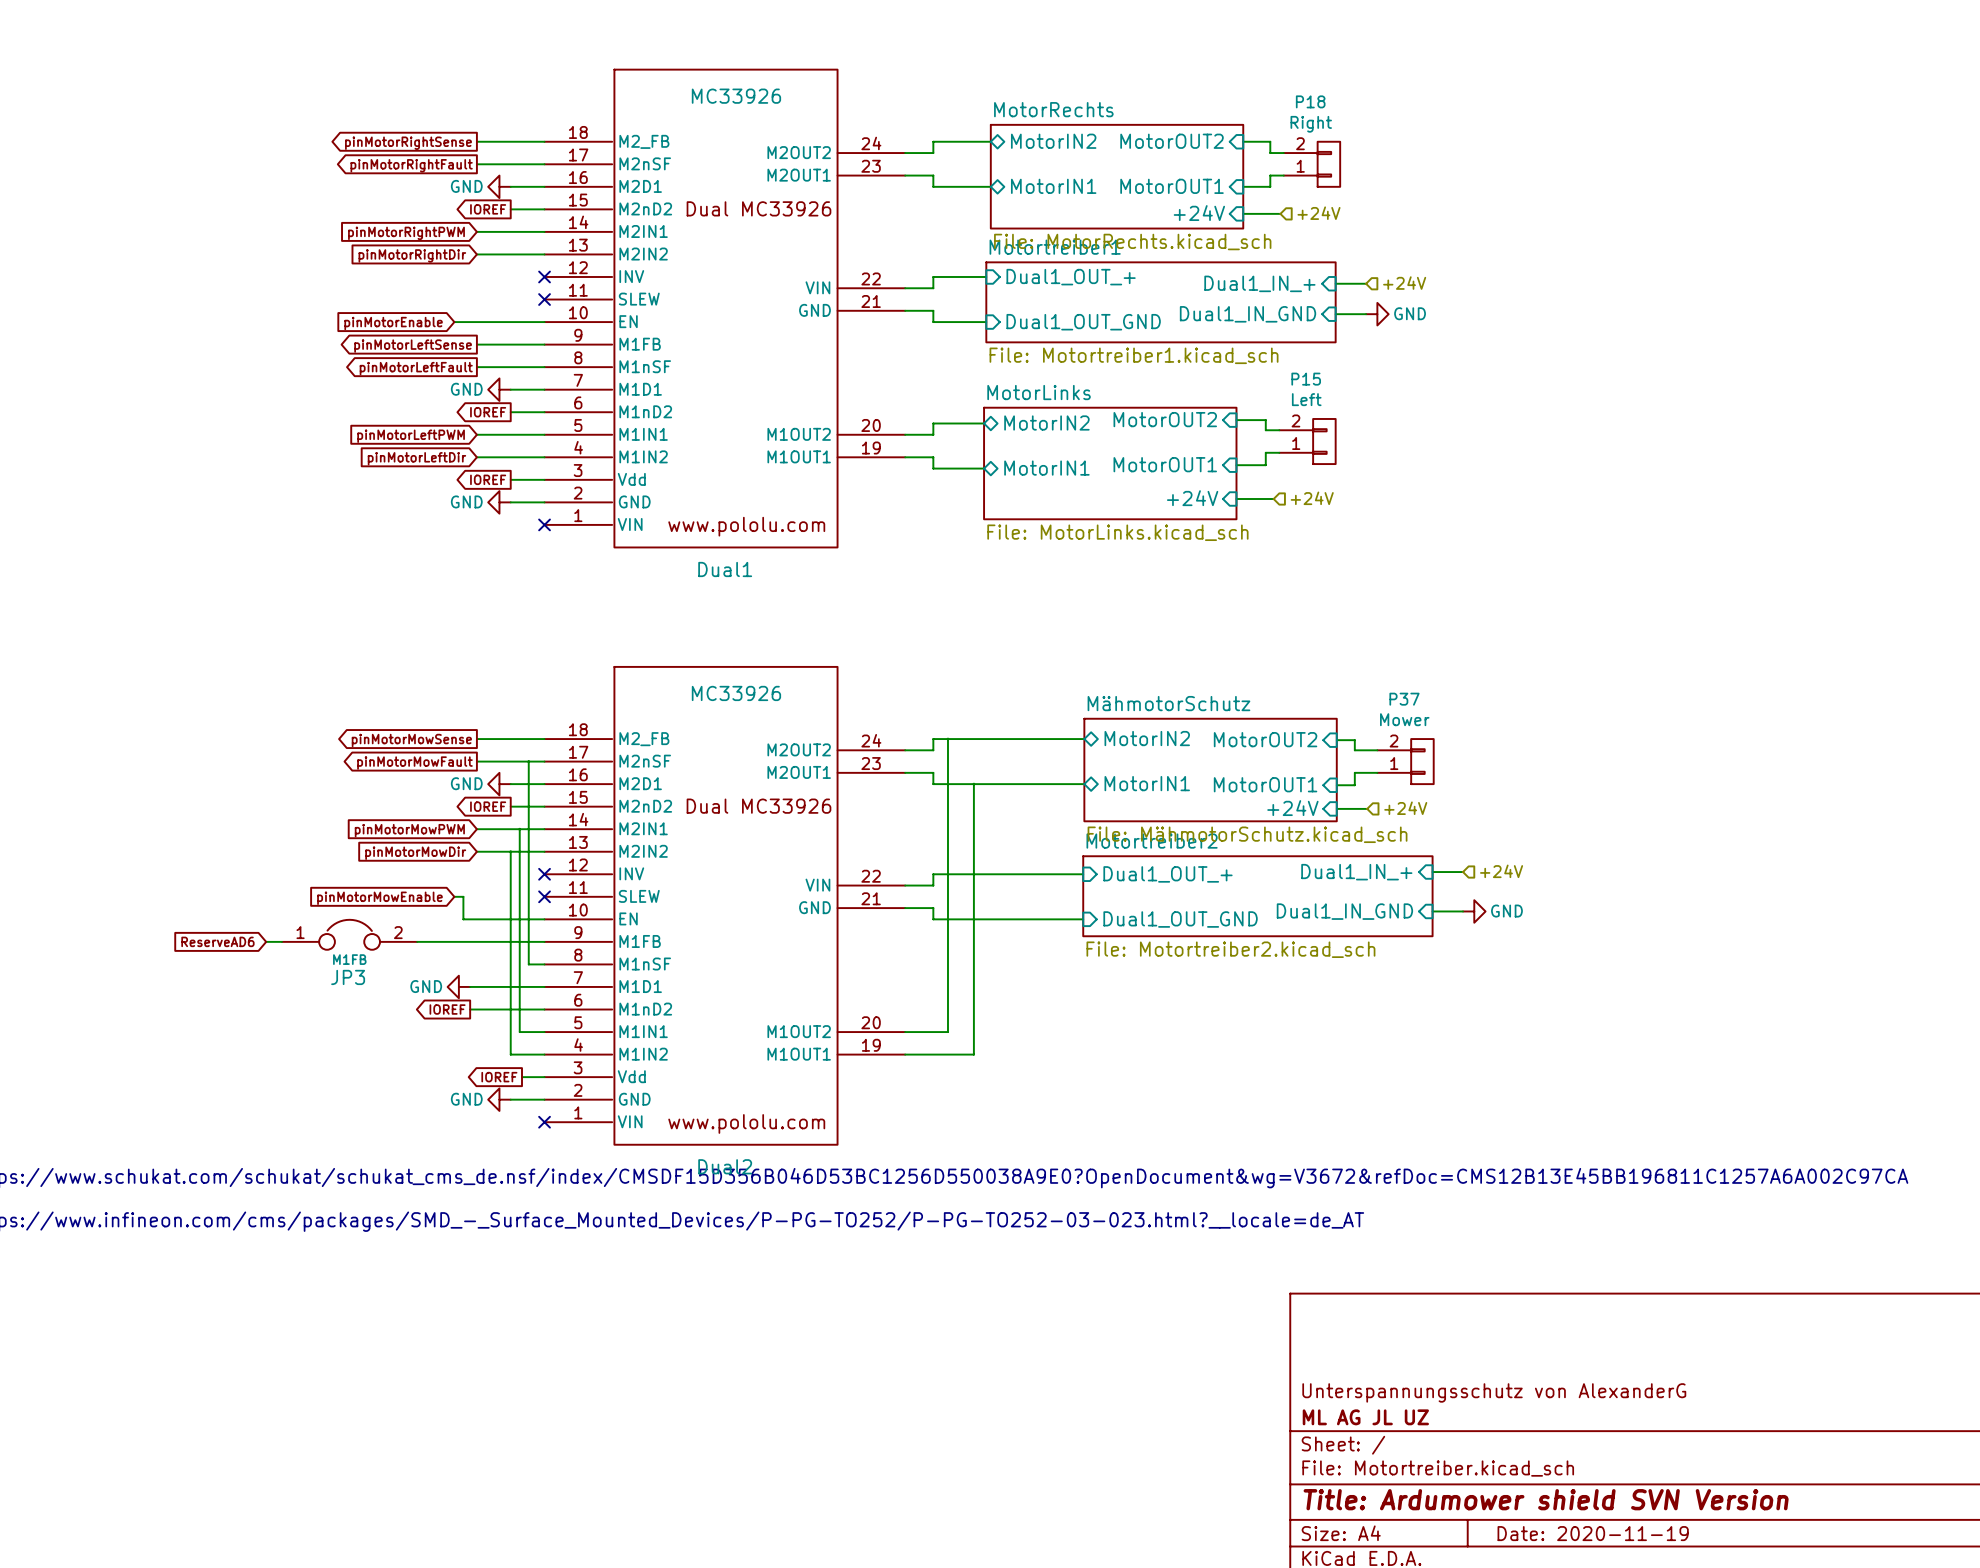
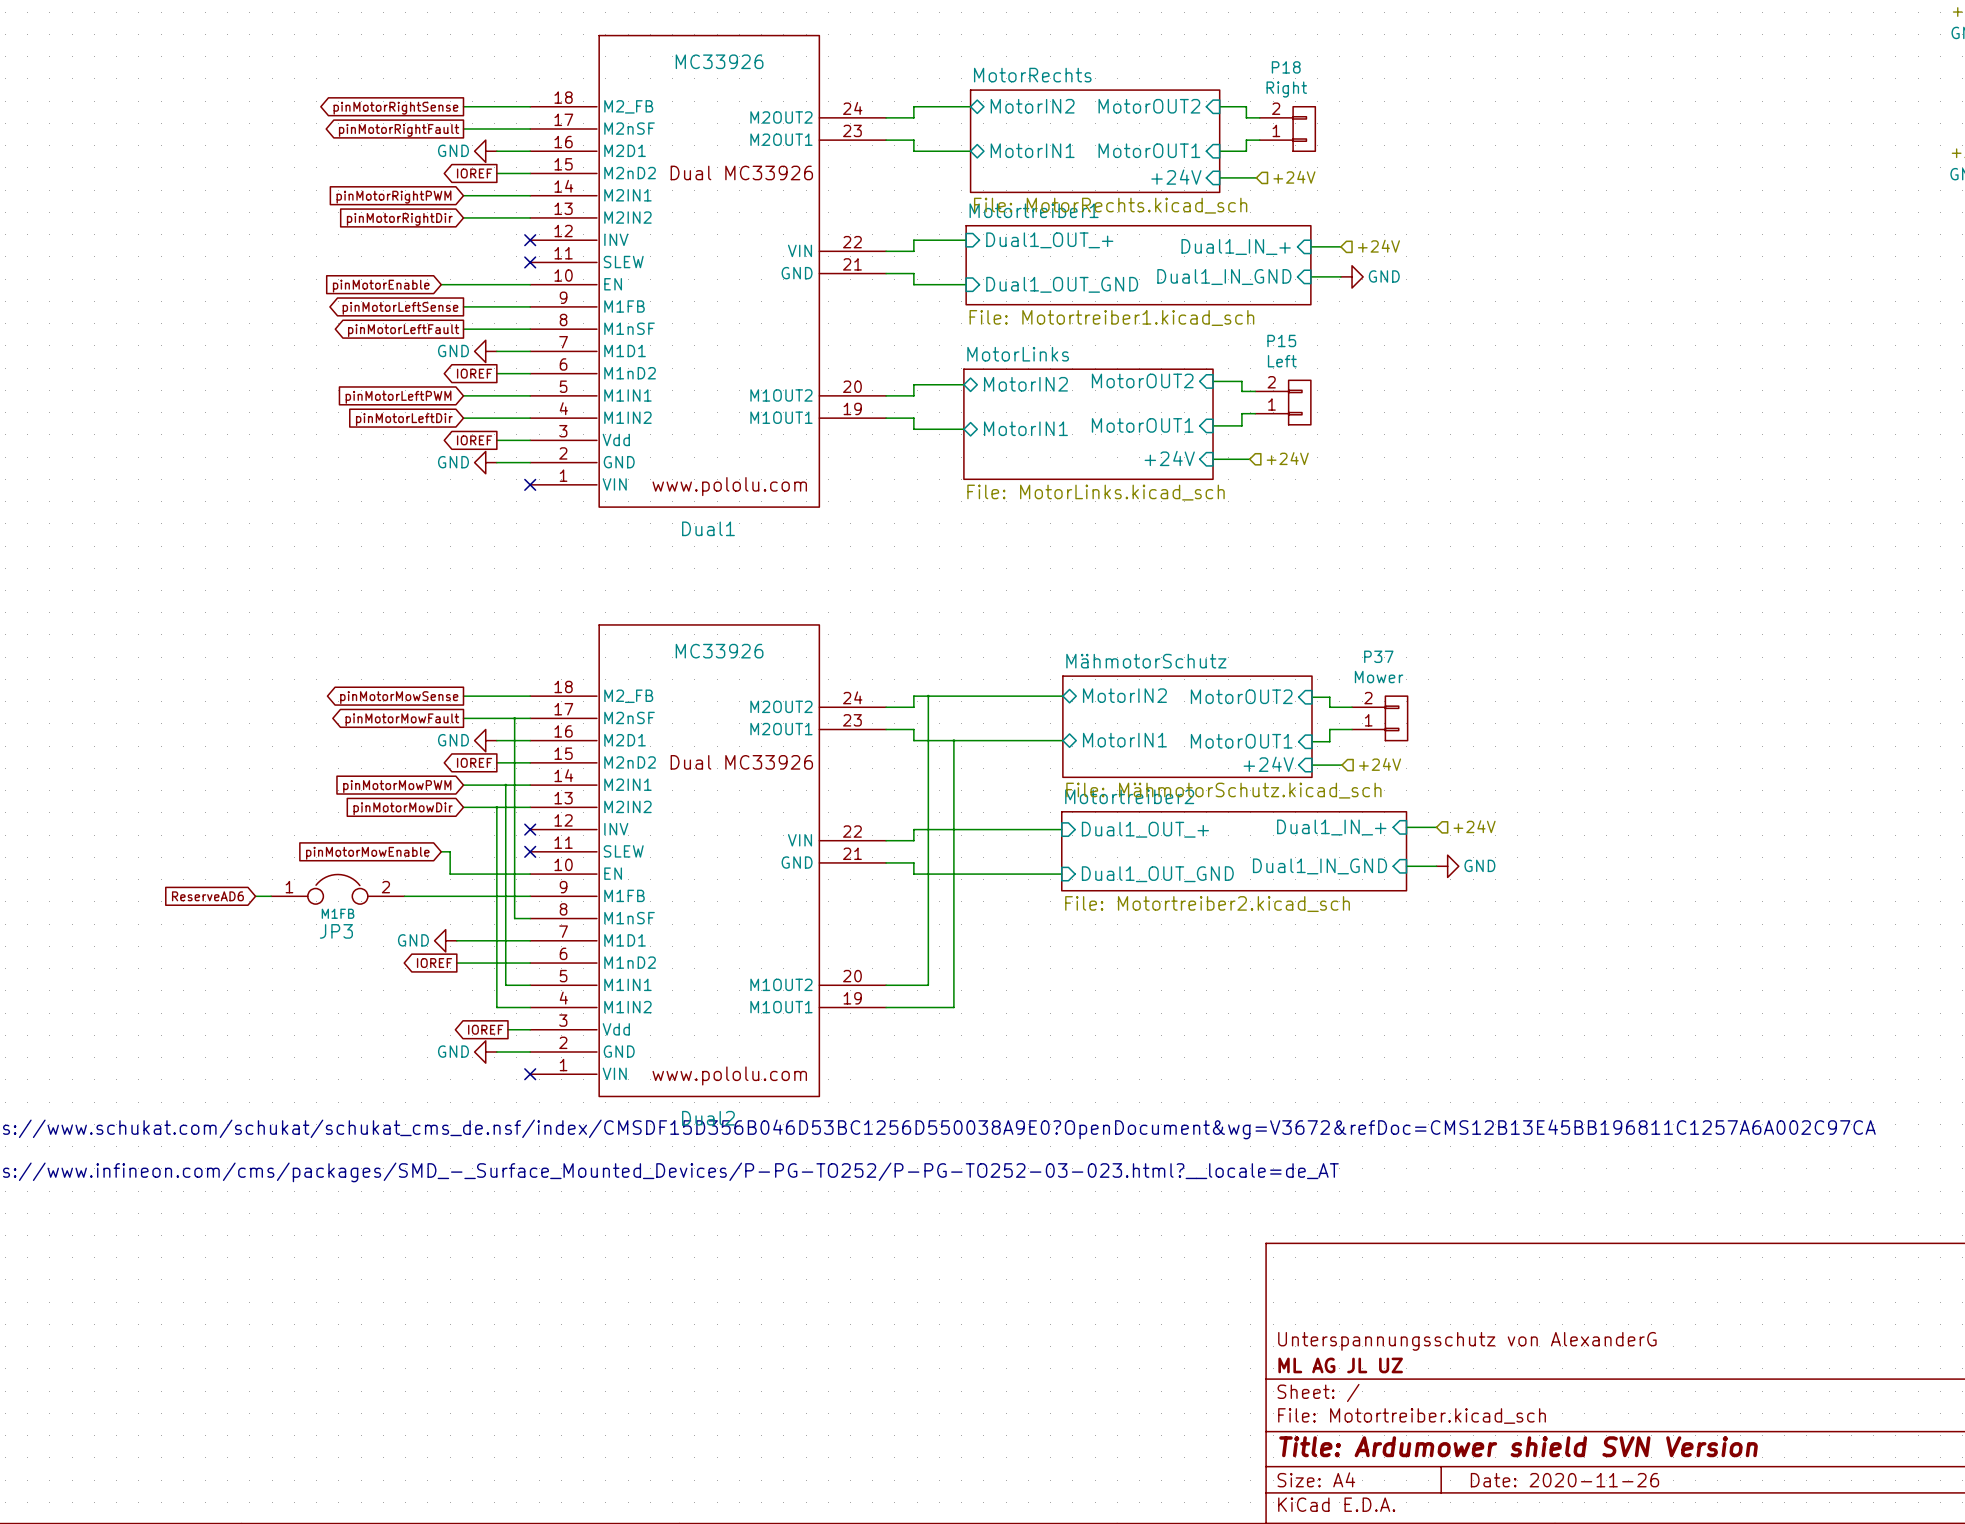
title block: Date: 2020-11-19 (1593, 1533) -> Date: 2020-11-26 (1564, 1480)

